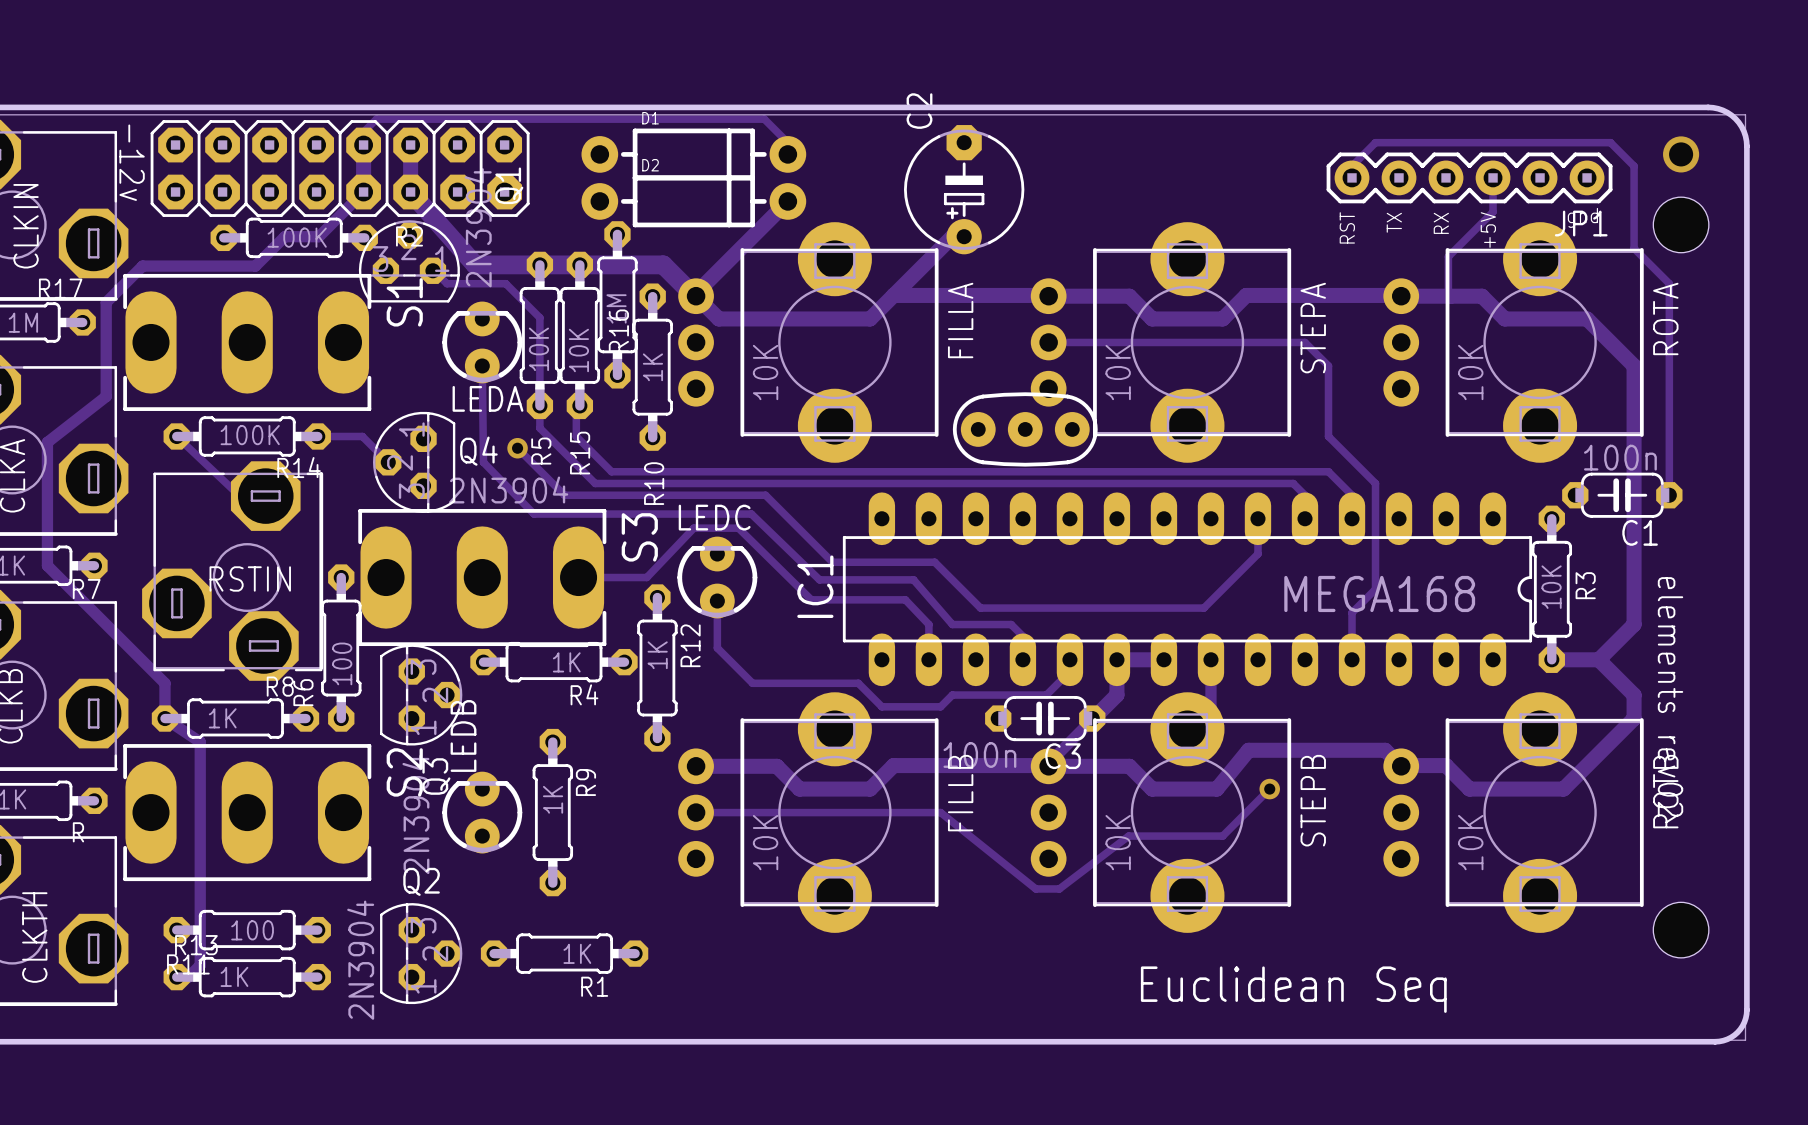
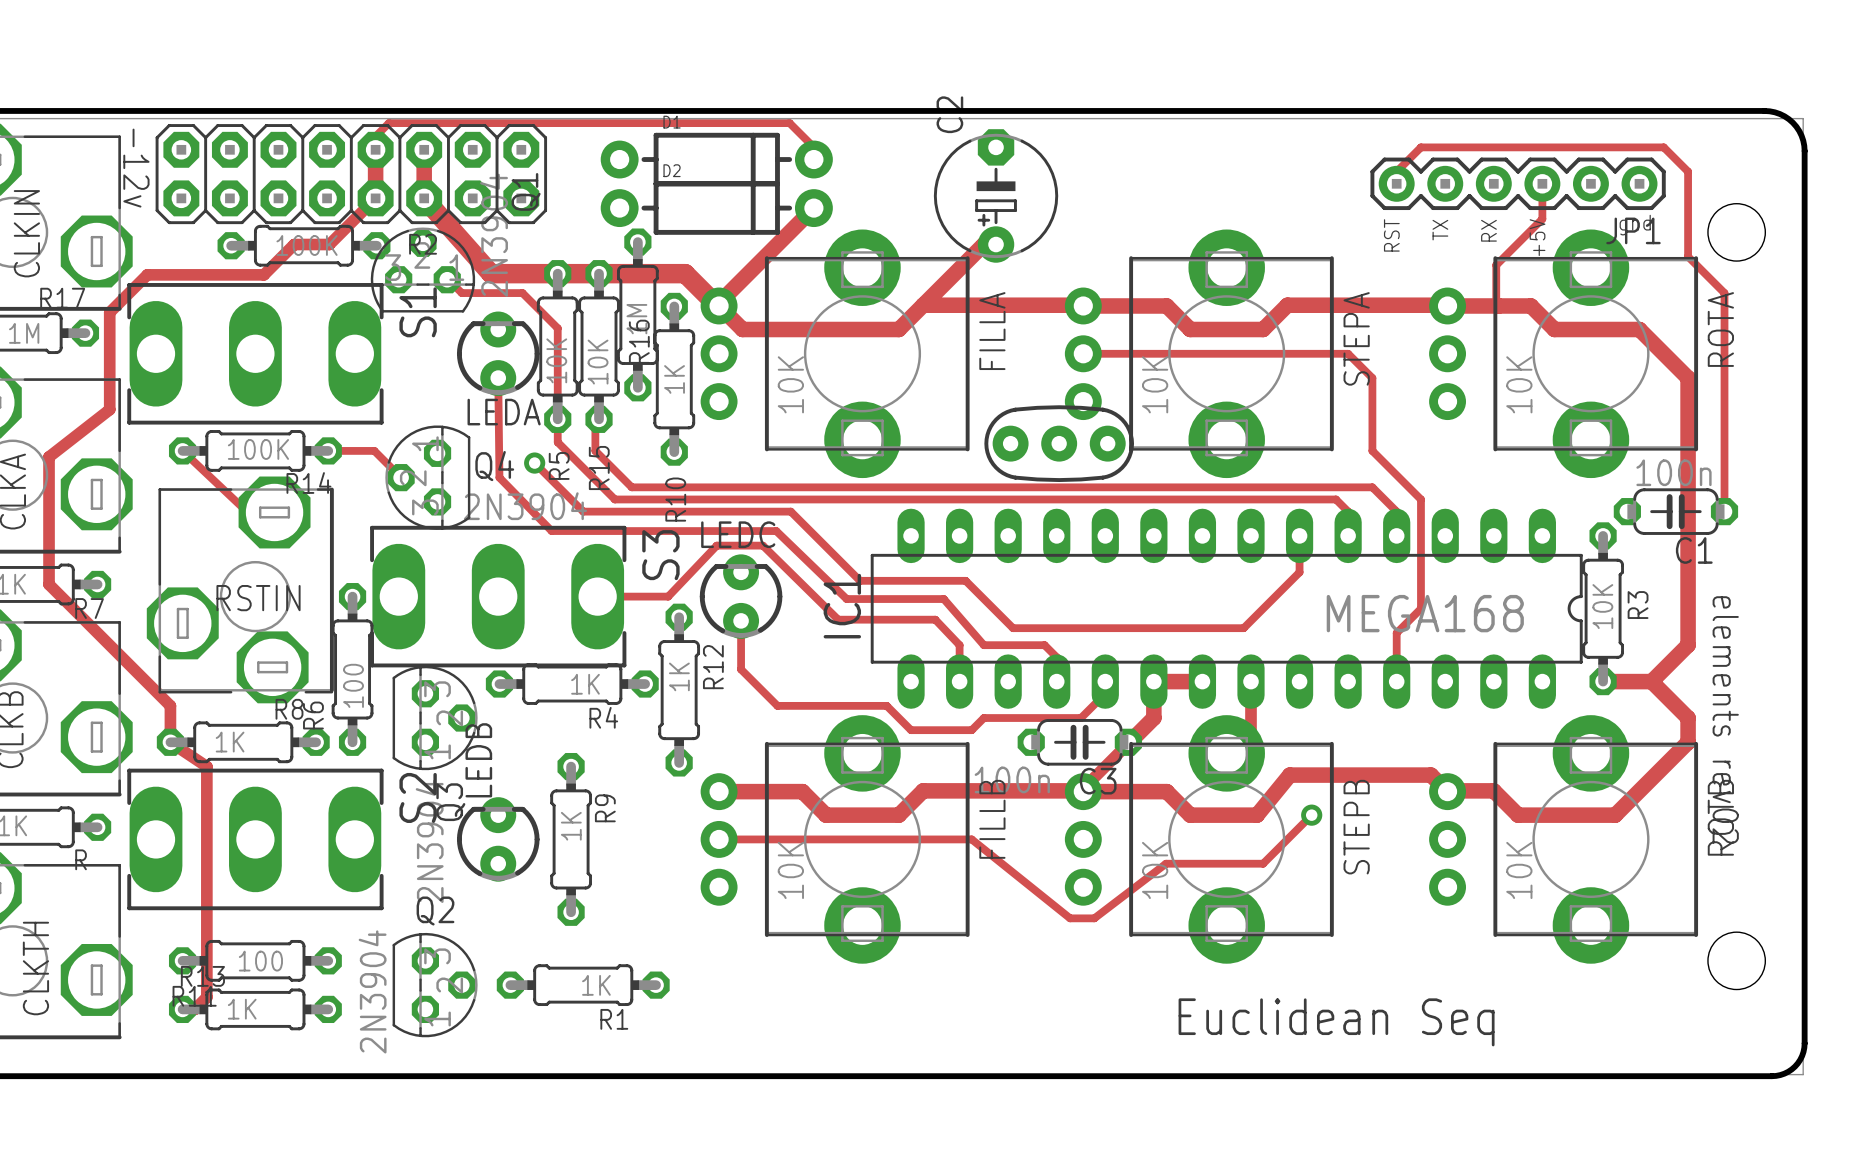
via: (1681, 154) -> none

